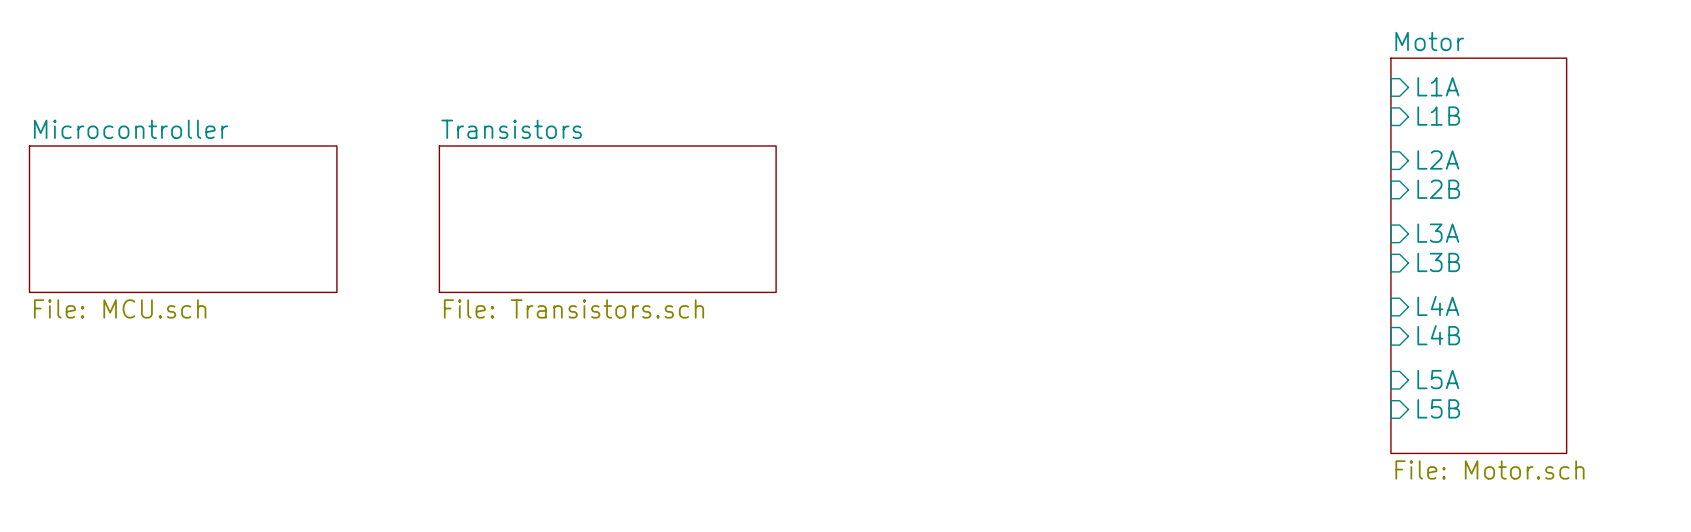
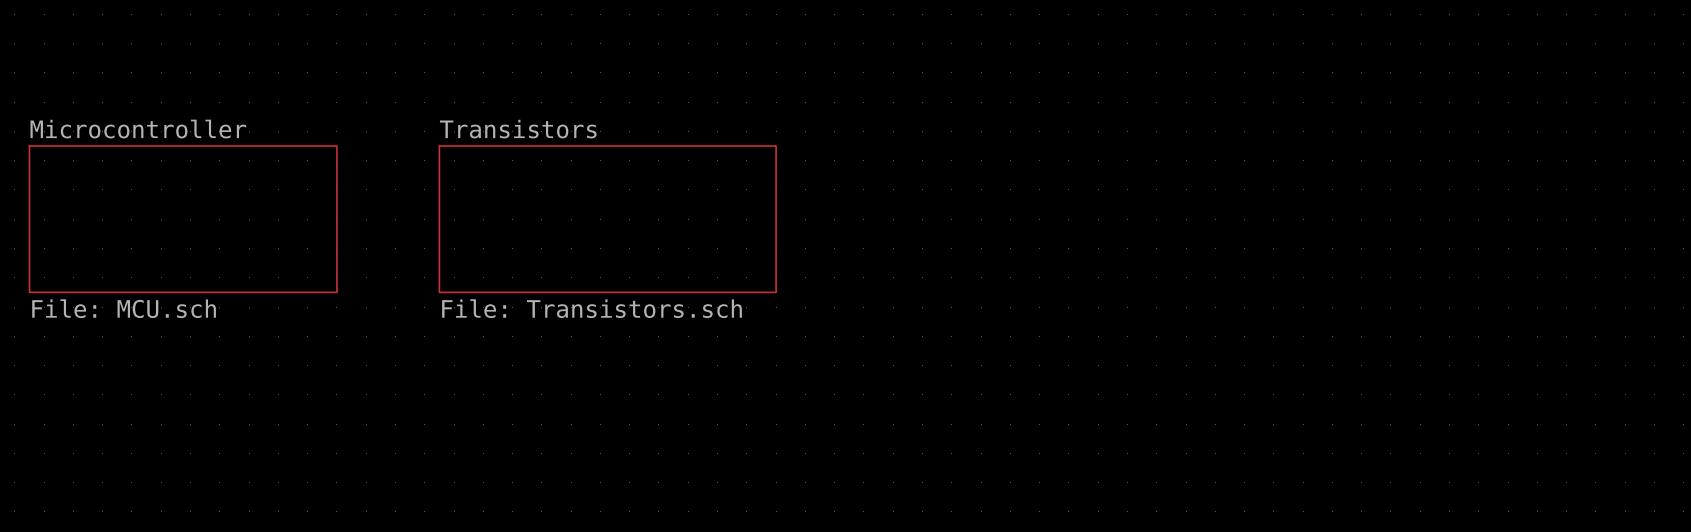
sheet pin: L1A (1438, 86) -> none
sheet pin: L1B (1438, 116) -> none
sheet pin: L2A (1438, 159) -> none
sheet pin: L2B (1438, 189) -> none
sheet pin: L3A (1438, 233) -> none
sheet Motor: File: Motor.sch (1478, 255) -> none
sheet pin: L3B (1438, 262) -> none
sheet pin: L4A (1438, 305) -> none
sheet pin: L4B (1438, 335) -> none
sheet pin: L5A (1438, 379) -> none
sheet pin: L5B (1438, 408) -> none

